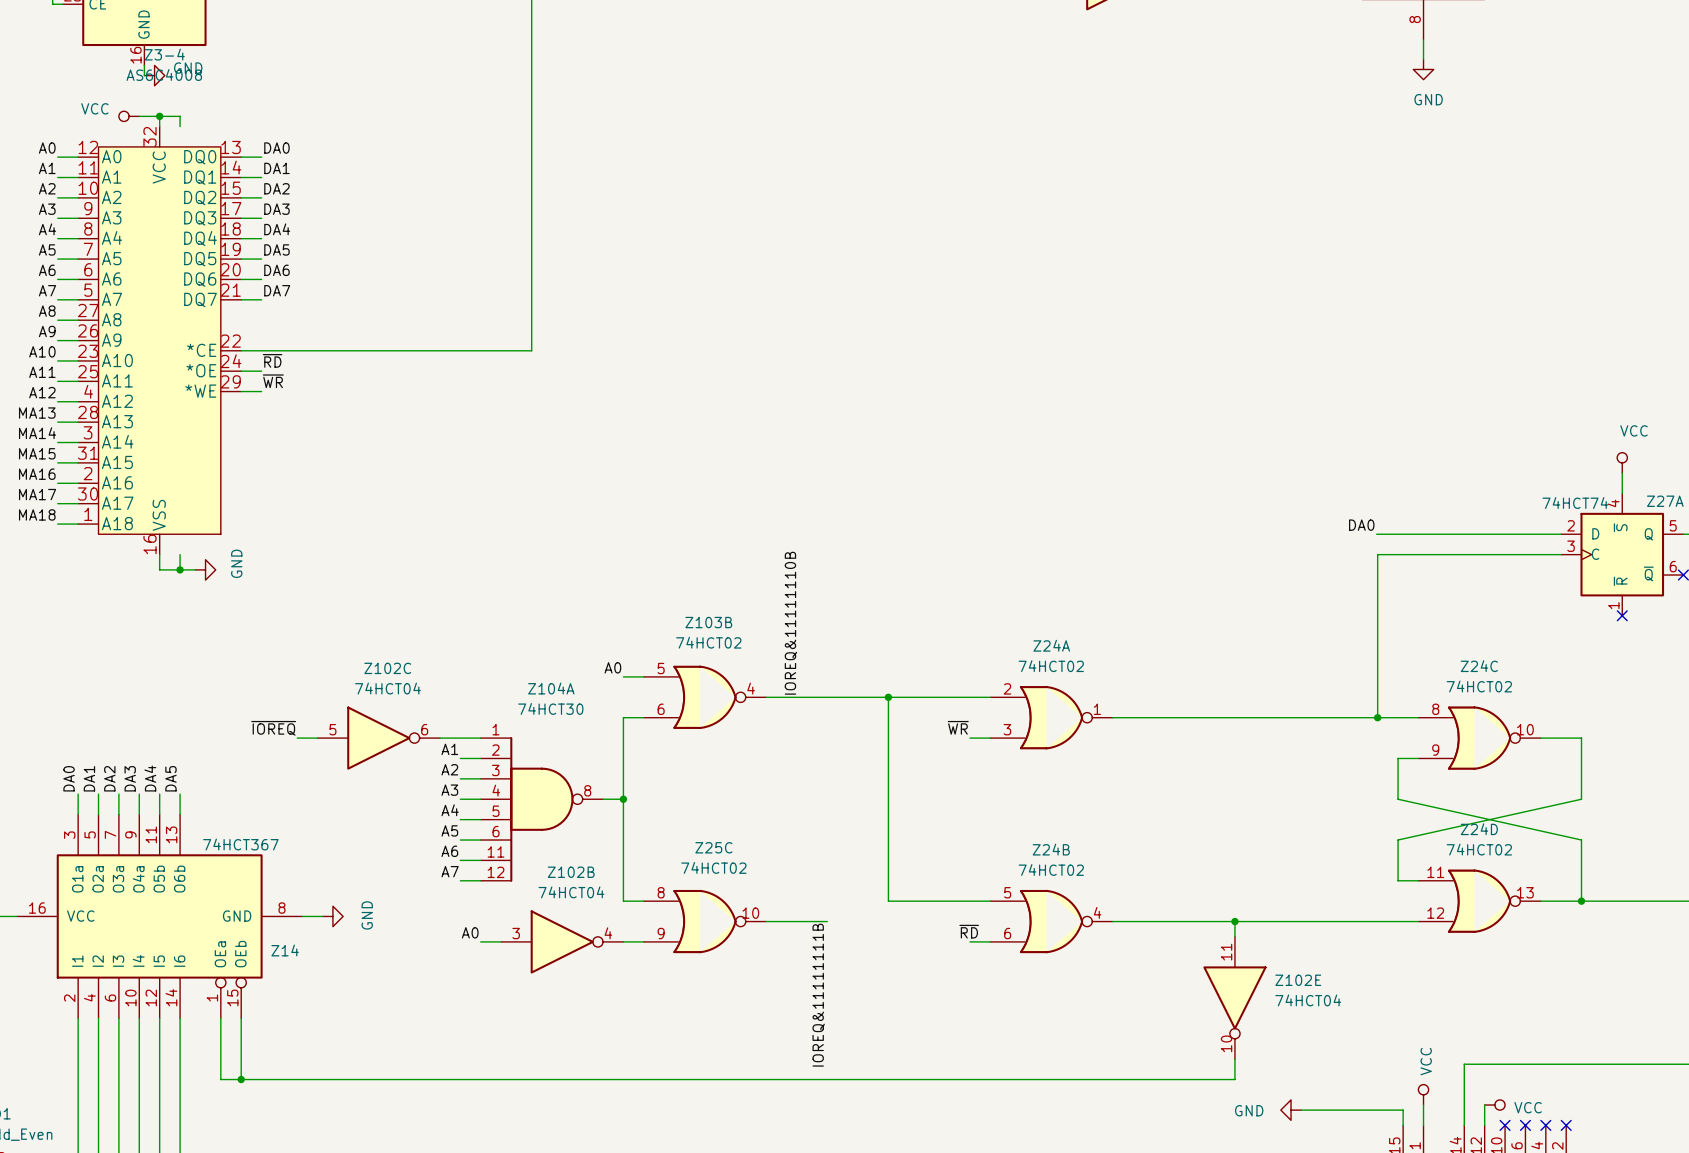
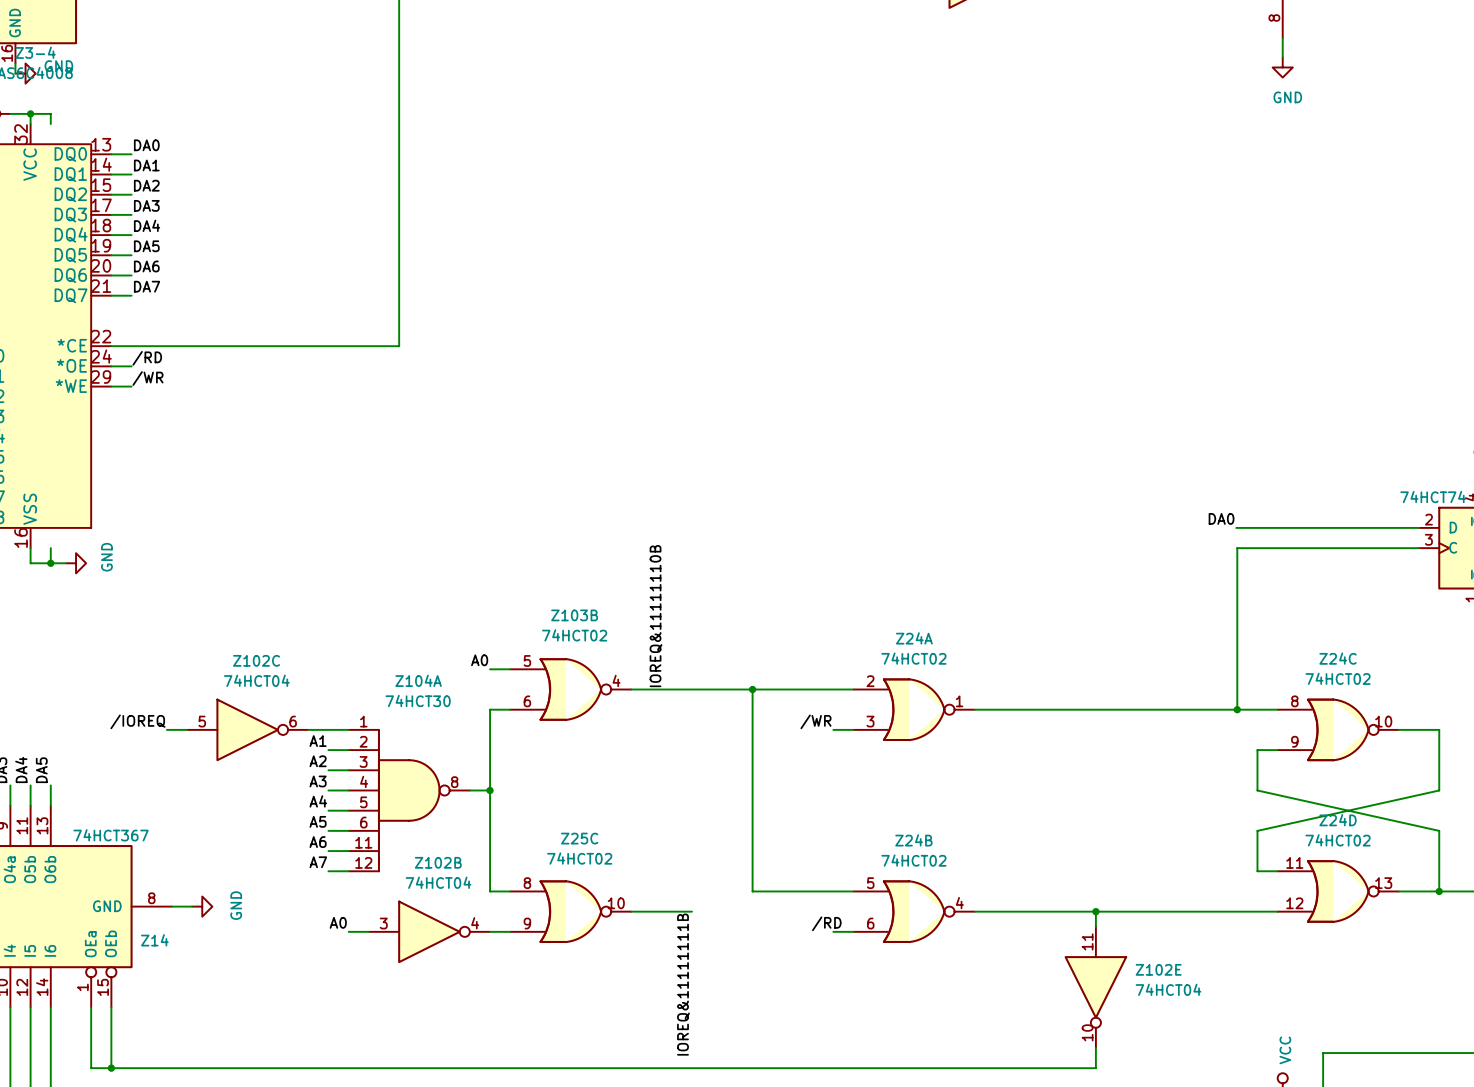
label: ~{RD} (272, 360) -> /RD (147, 358)
label: ~{WR} (273, 381) -> /WR (147, 378)
label: ~{WR} (958, 727) -> /WR (815, 721)
label: ~{IOREQ} (273, 728) -> /IOREQ (137, 721)
label: ~{RD} (969, 931) -> /RD (826, 923)

